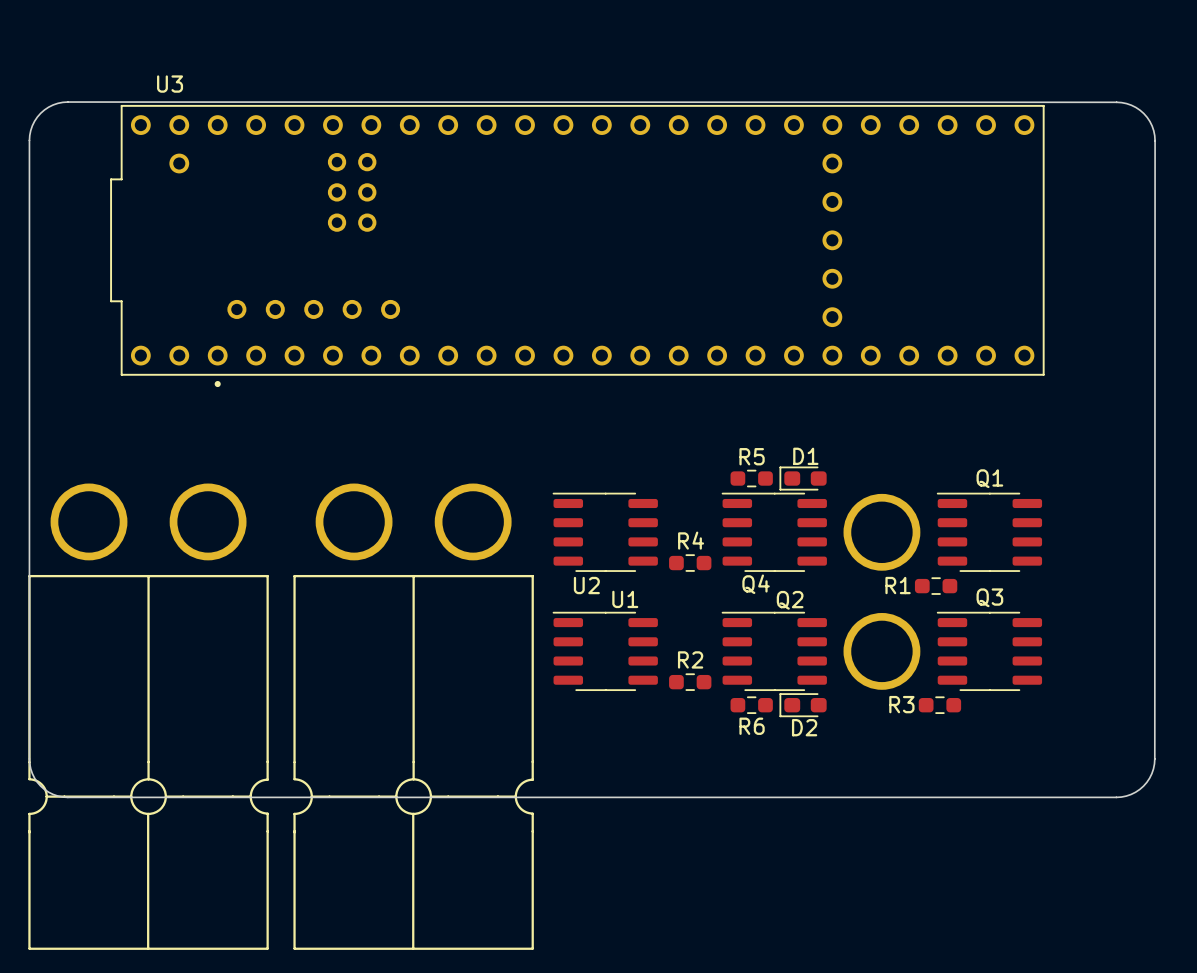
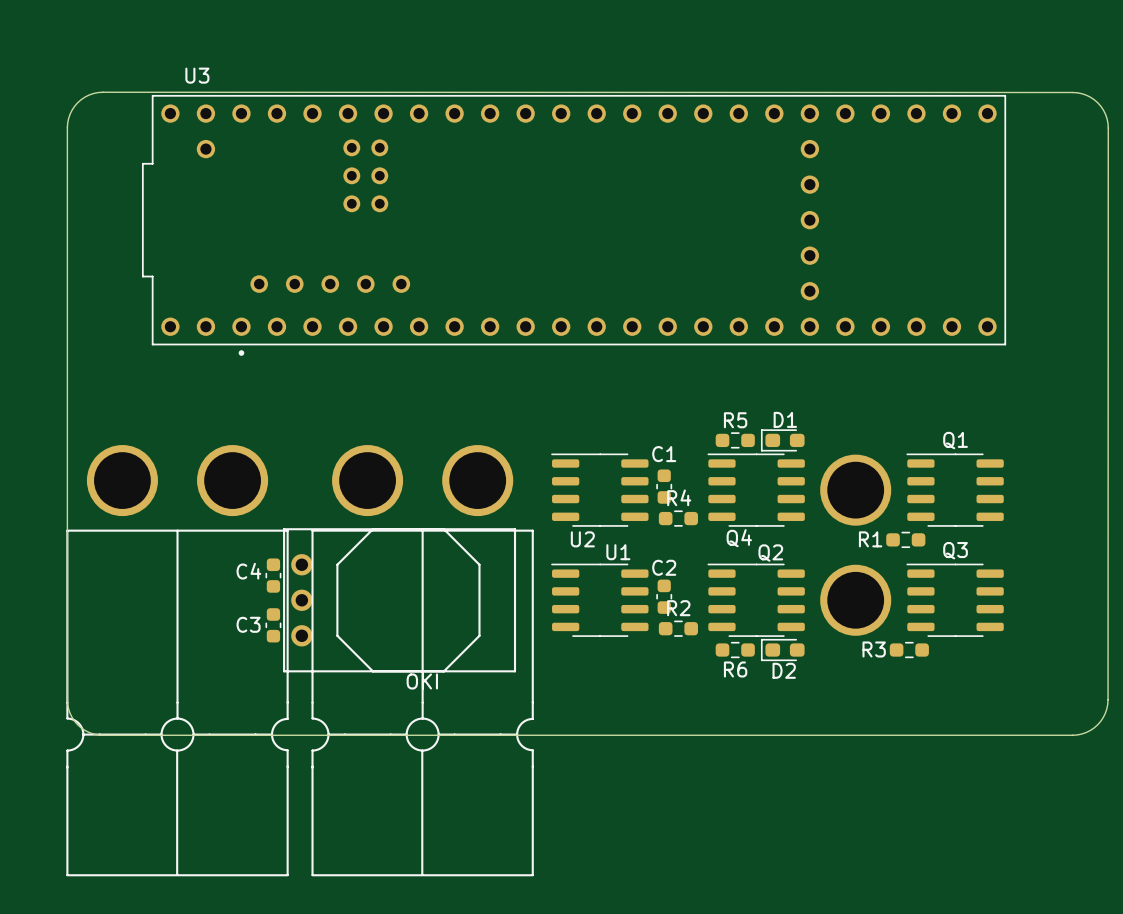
C1: none -> (664, 486)
C4: none -> (273, 575)
C2: none -> (664, 596)
part: none -> OKI (399, 600)
C3: none -> (273, 625)

